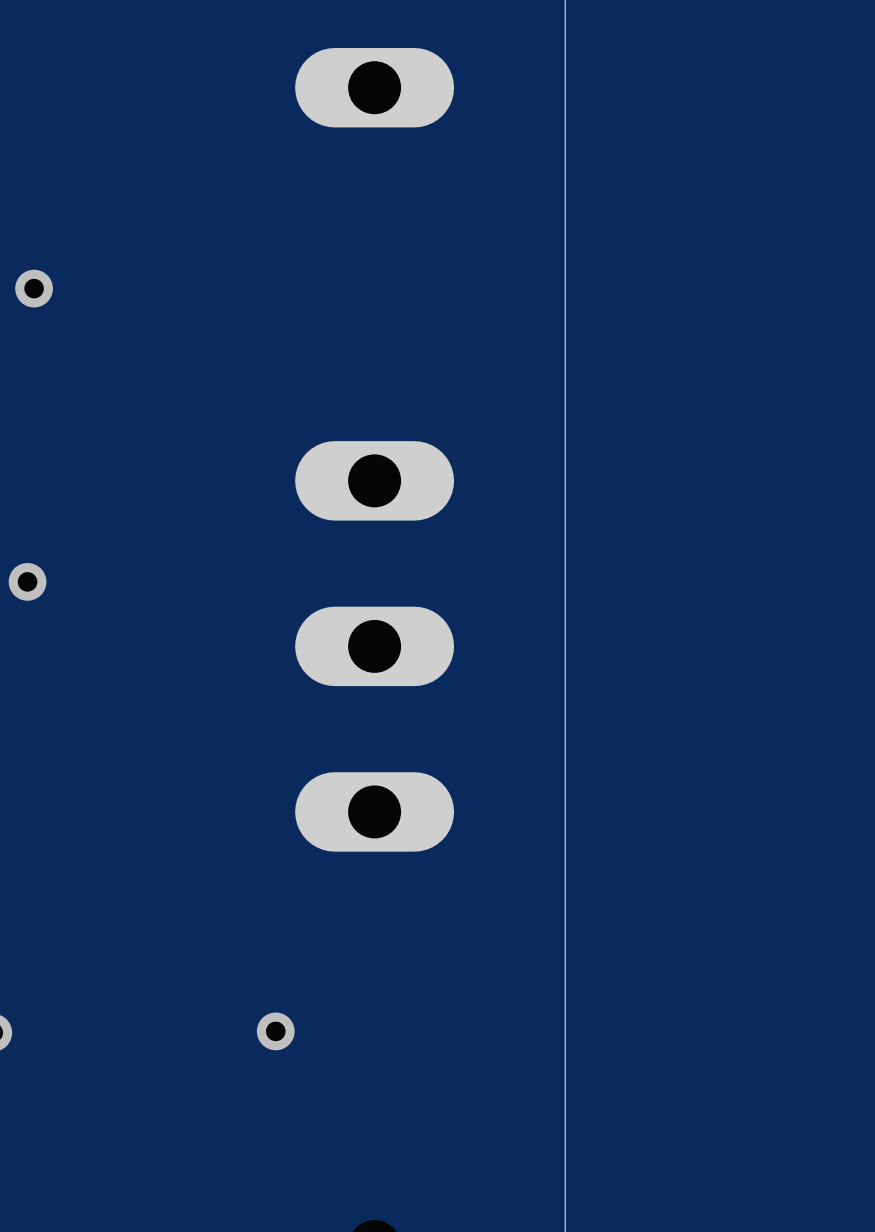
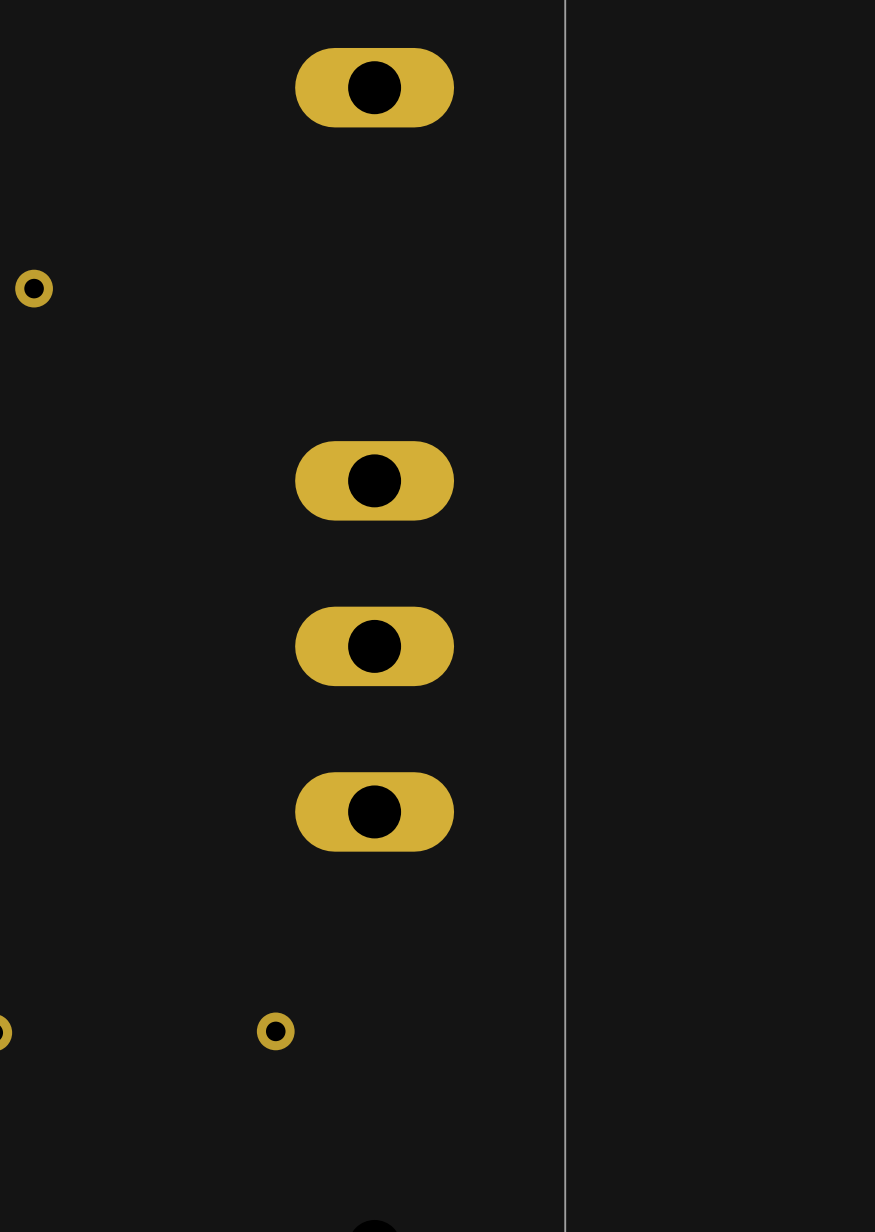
via: (27, 581) -> none

